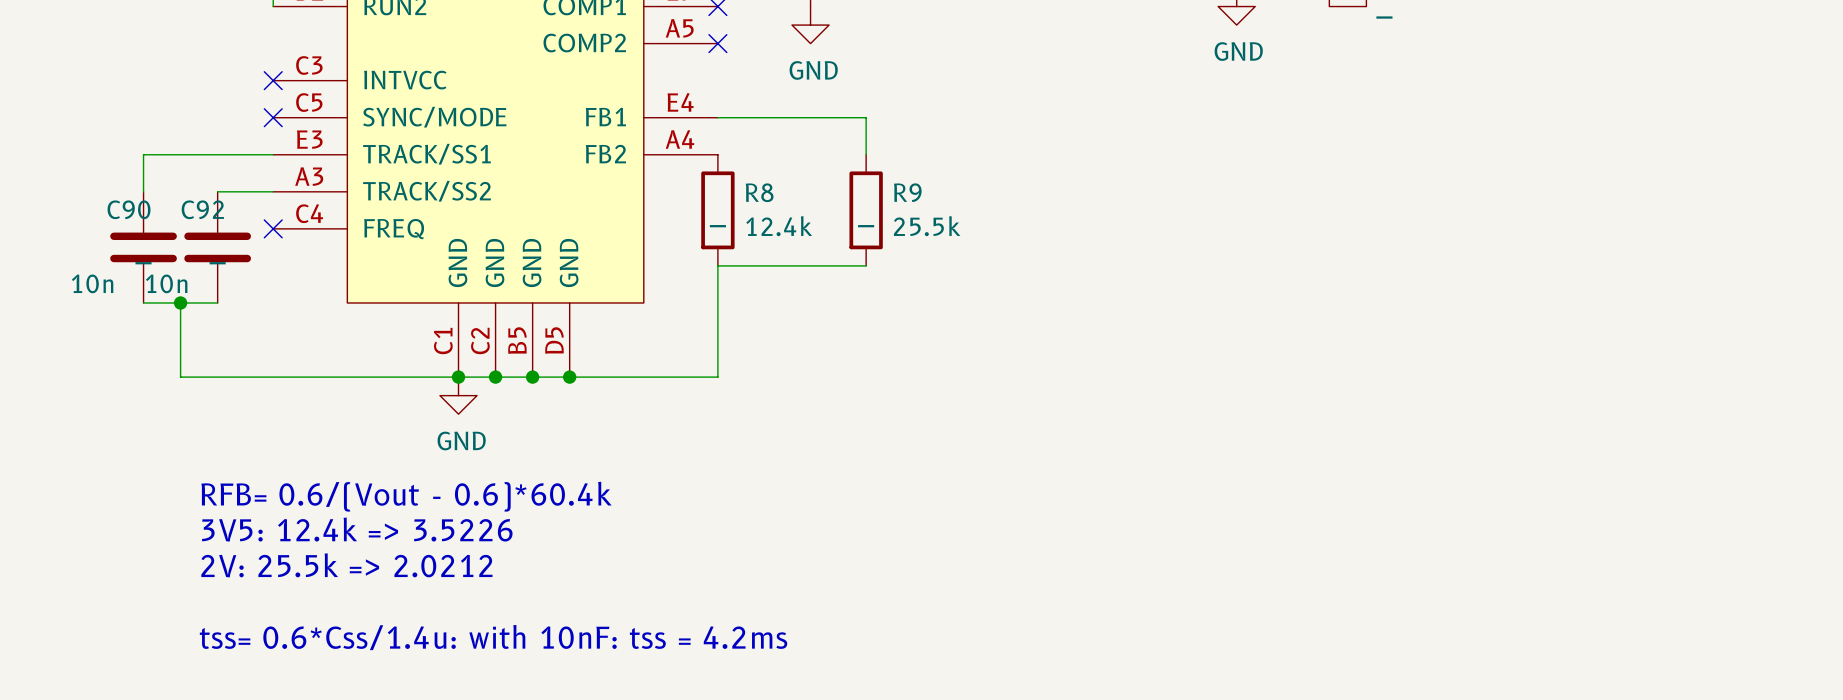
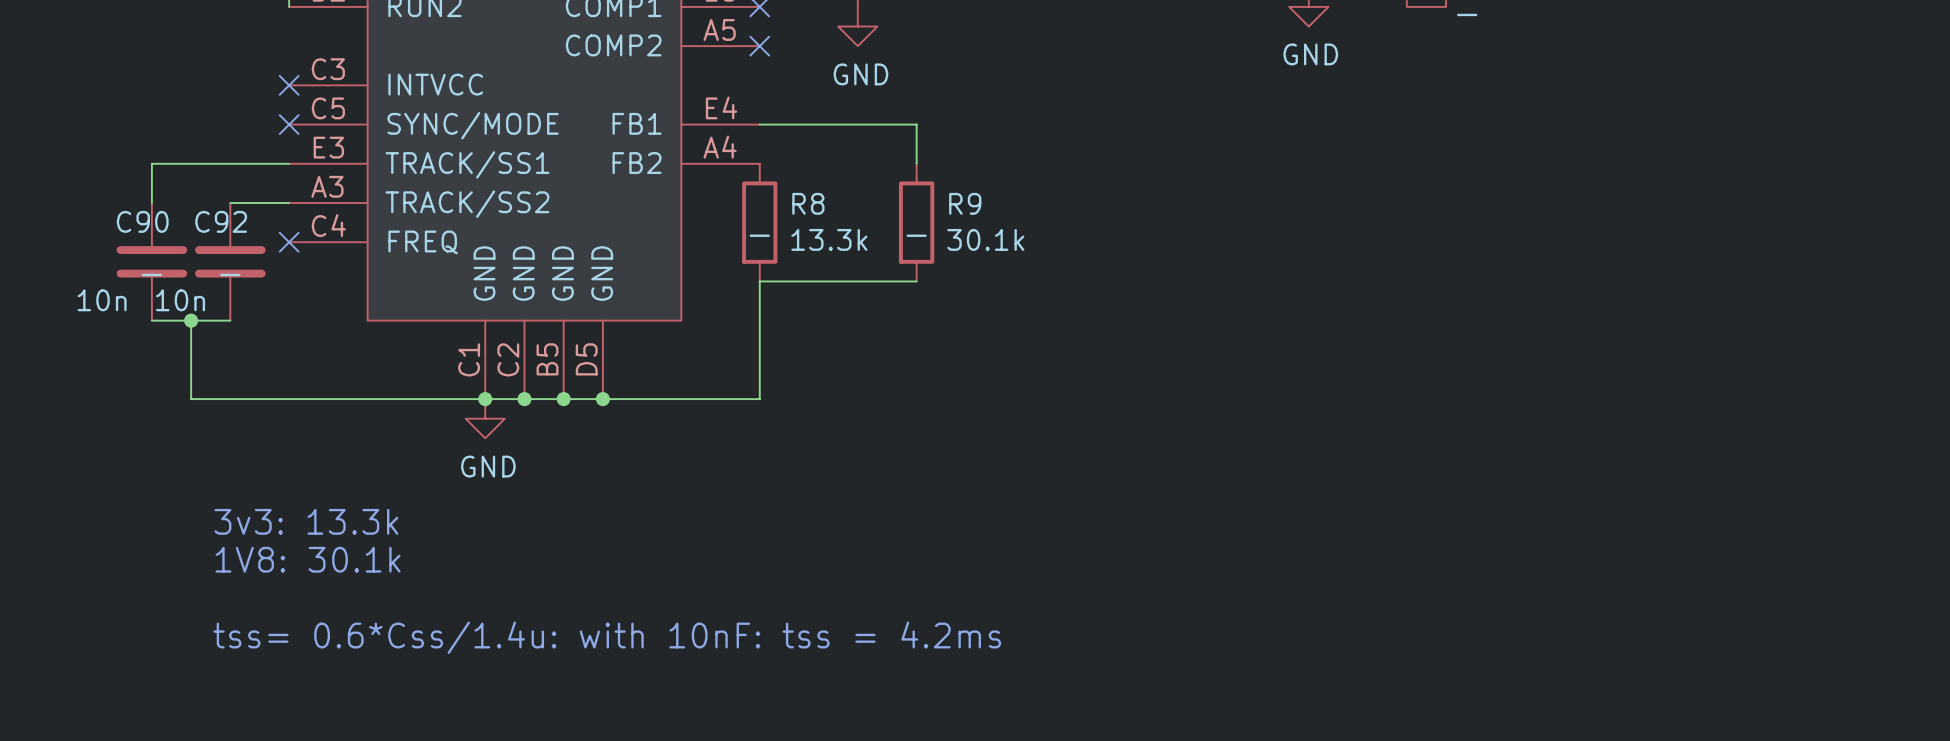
R8 value: 12.4k (779, 226) -> 13.3k (829, 239)
R9 value: 25.5k (927, 226) -> 30.1k (985, 239)
text: RFB= 0.6/(Vout - 0.6)*60.4k (406, 496) -> 3v3: 13.3k (306, 521)
text: 3V5: 12.4k => 3.5226 (357, 529) -> 1V8: 30.1k (308, 559)
text: 2V: 25.5k => 2.0212 (346, 565) -> none
text position: tss= 0.6*Css/1.4u: with 10nF: tss = 4.2ms (493, 637) -> tss= 0.6*Css/1.4u: with 10nF: tss = 4.2ms (607, 637)

